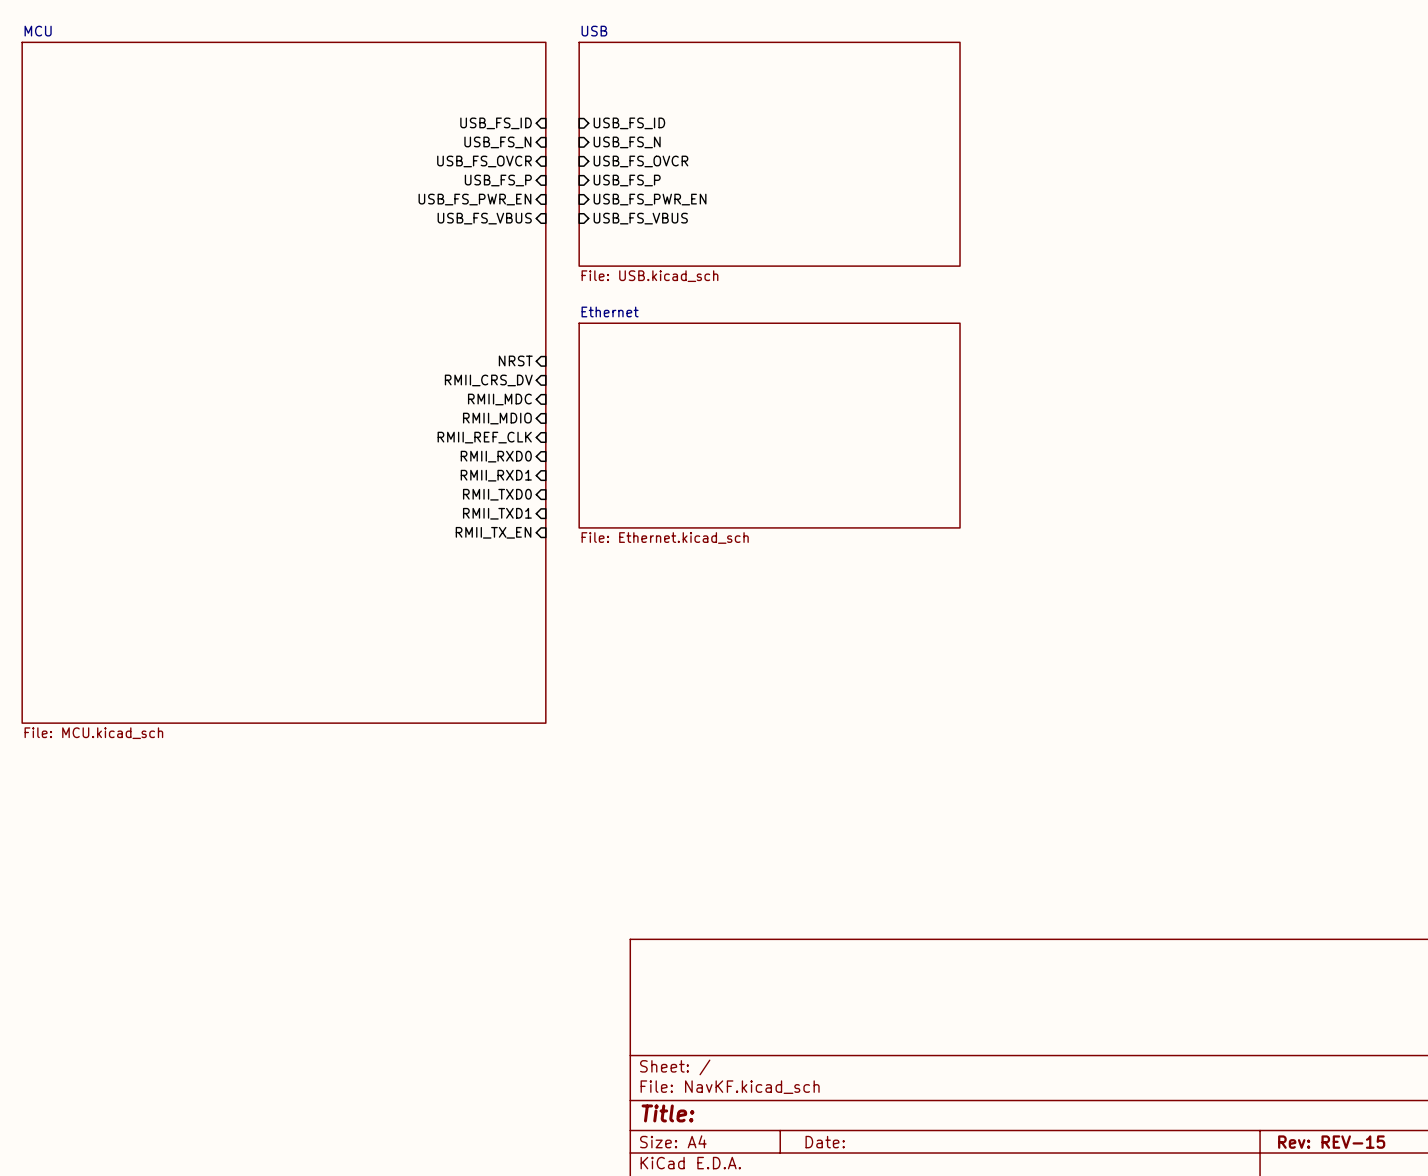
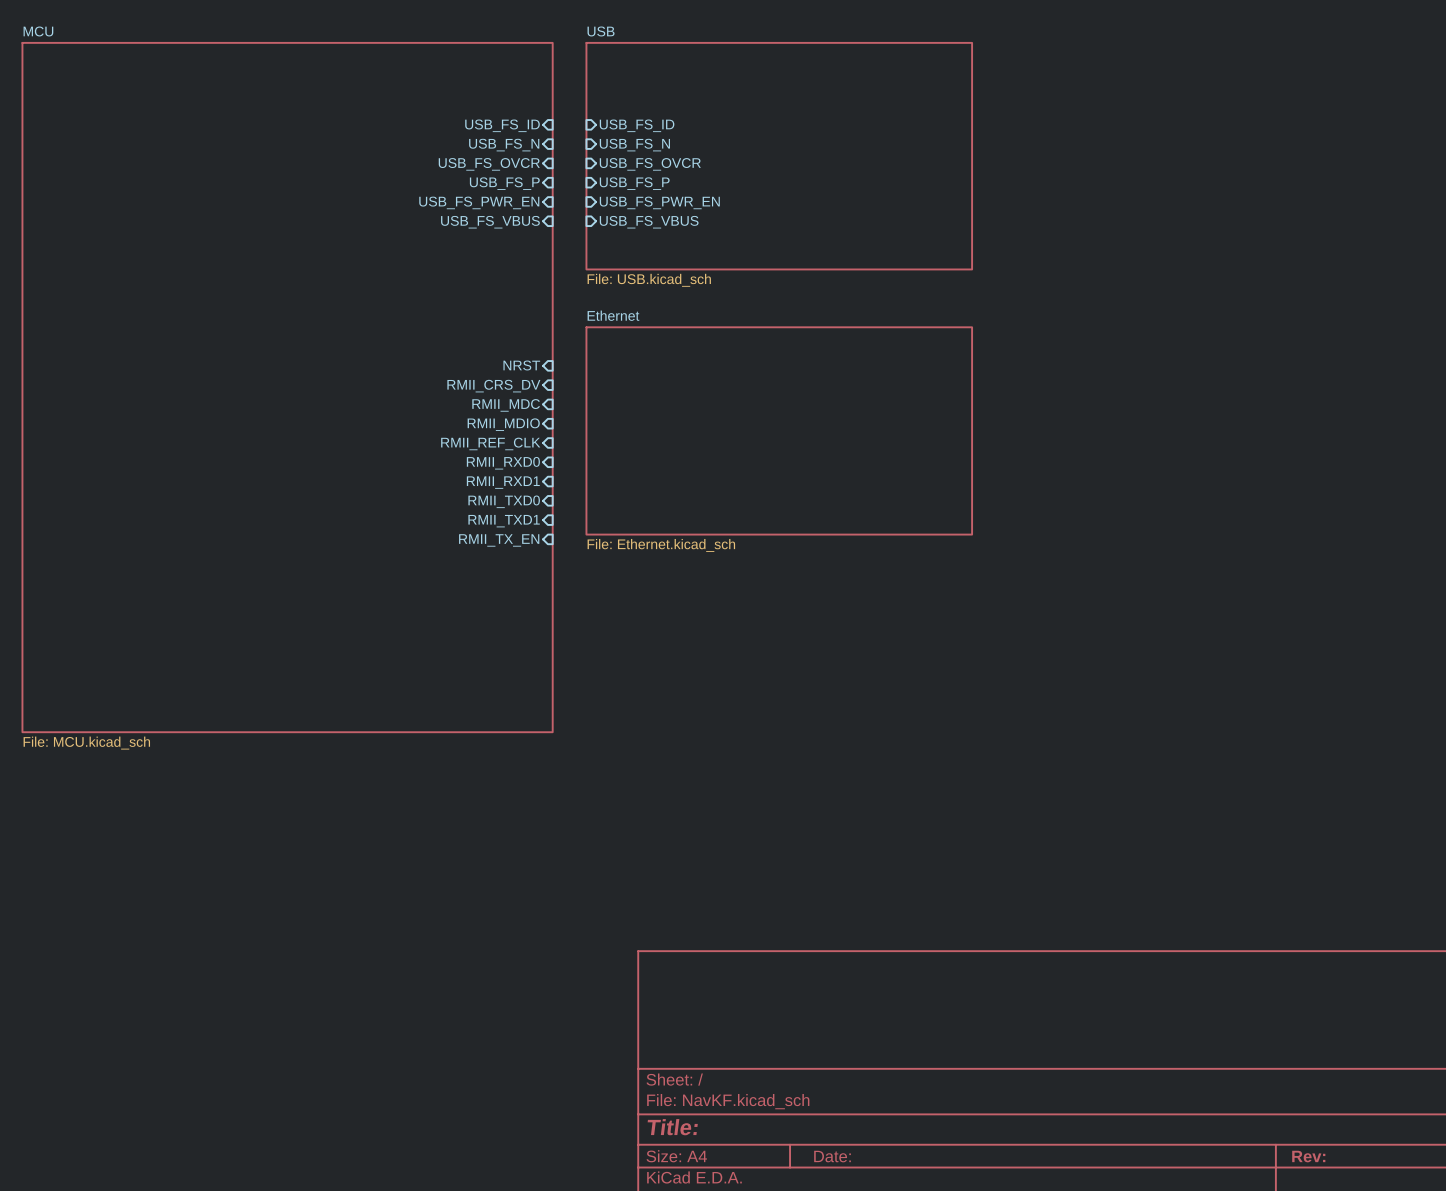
title block: Rev: REV-15 (1331, 1142) -> Rev: (1308, 1156)

